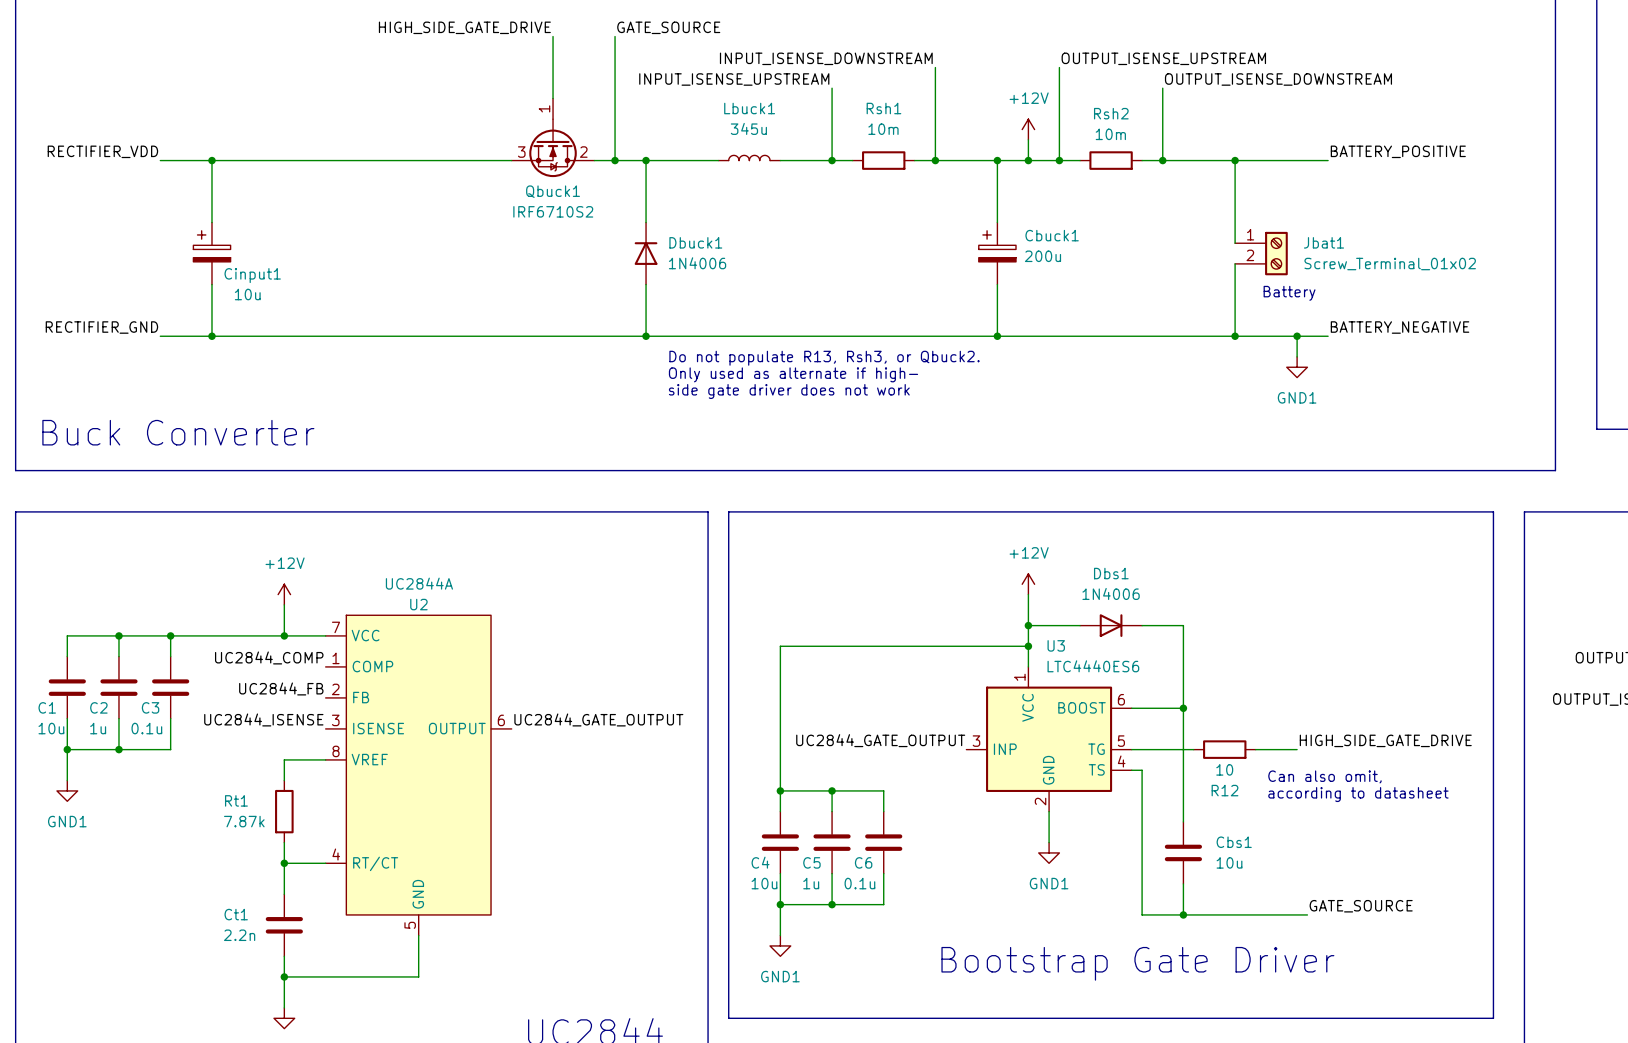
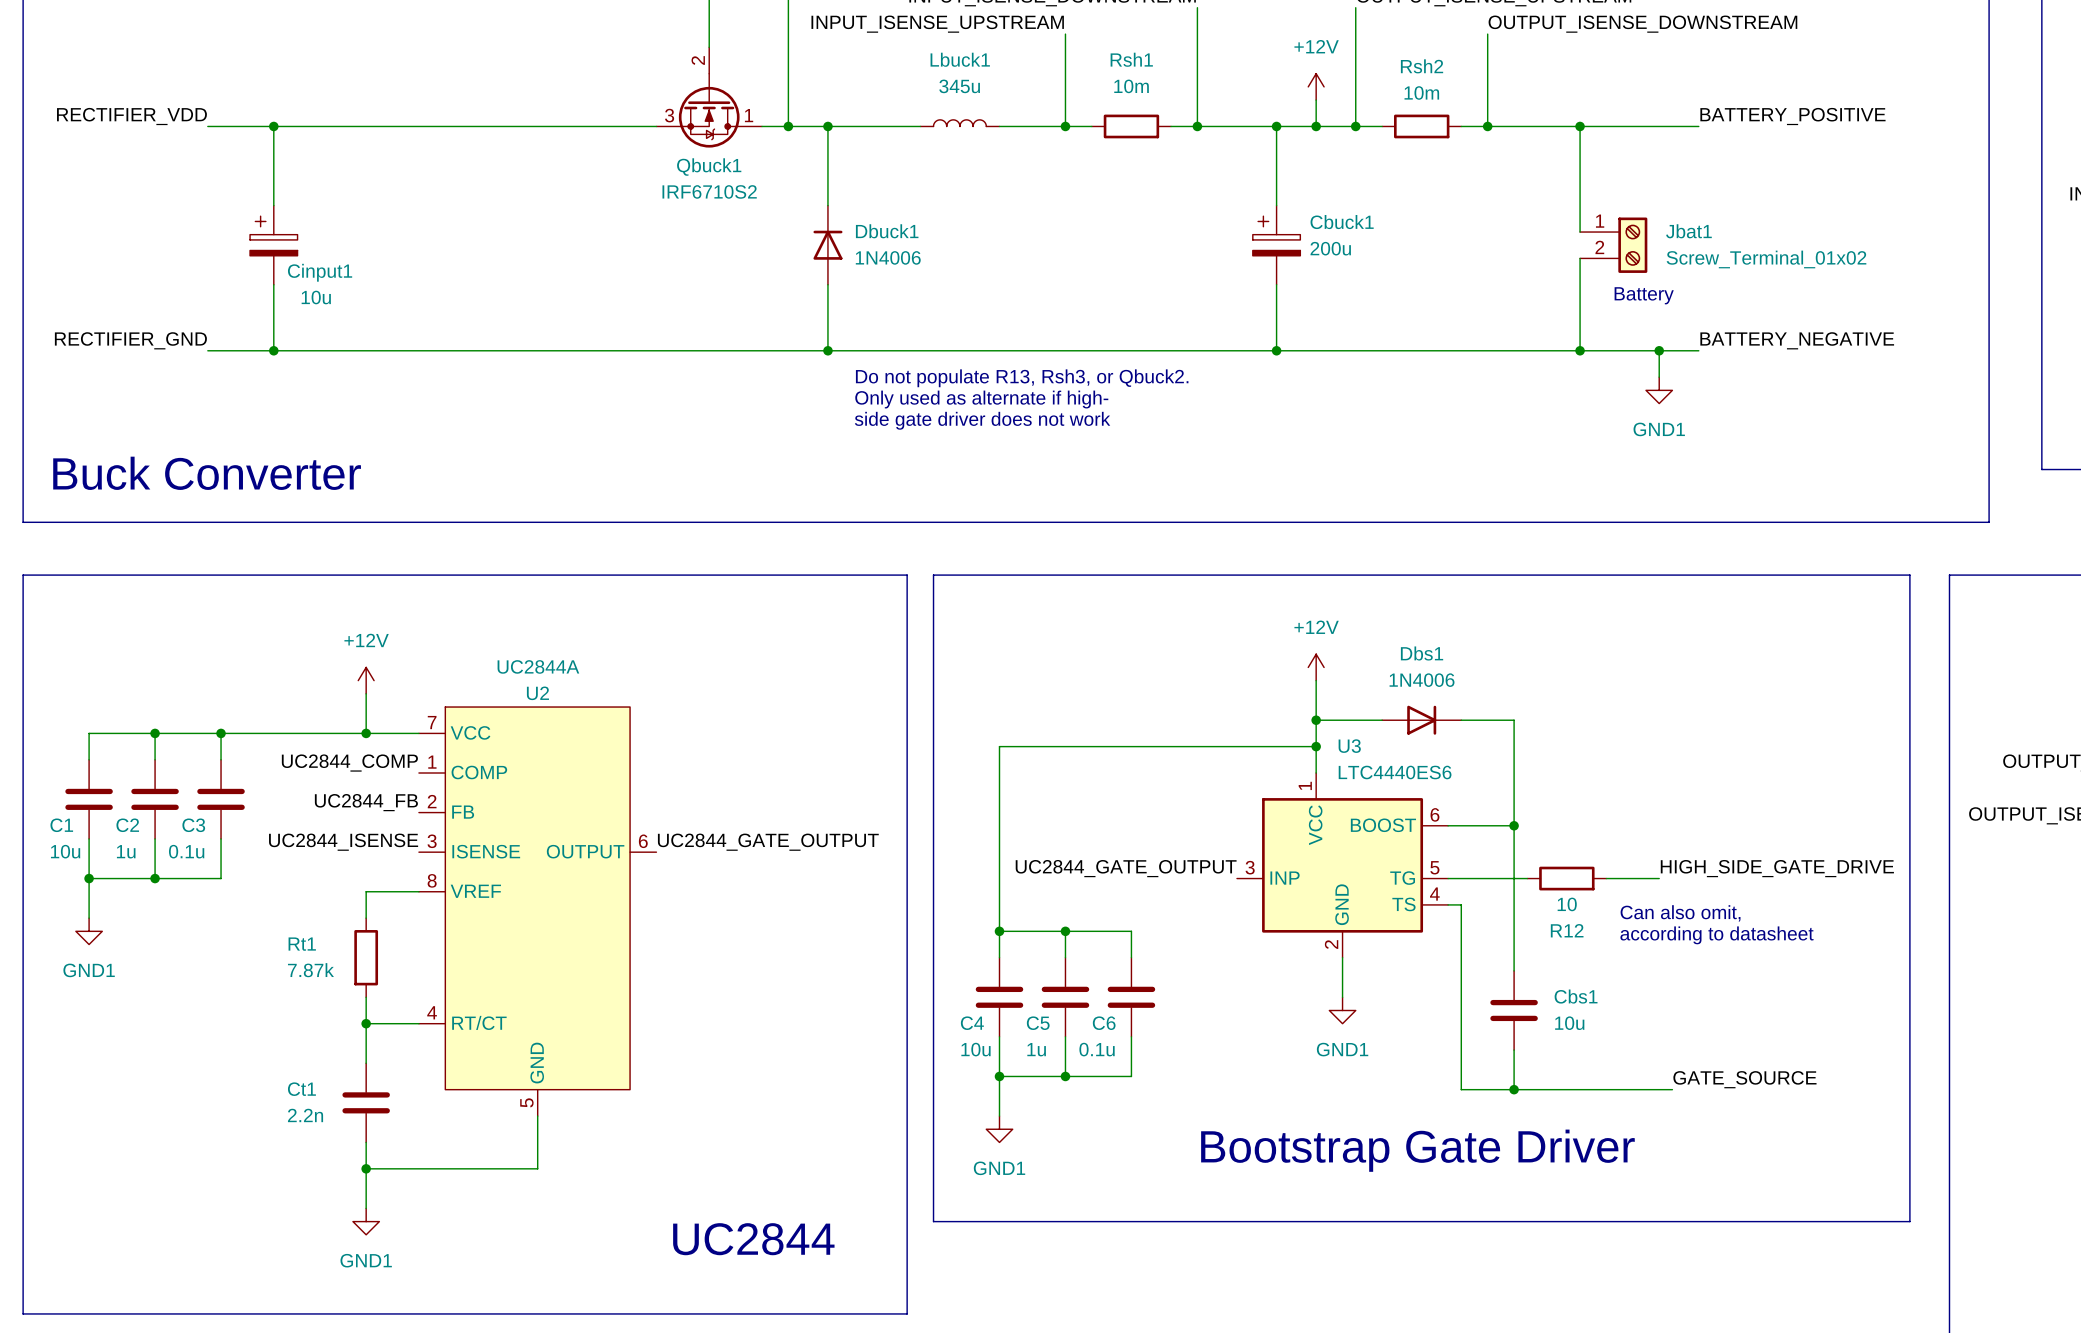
Qbuck1 pin number: 1 (544, 108) -> 2 (698, 60)
Qbuck1 pin number: 2 (583, 152) -> 1 (749, 115)

